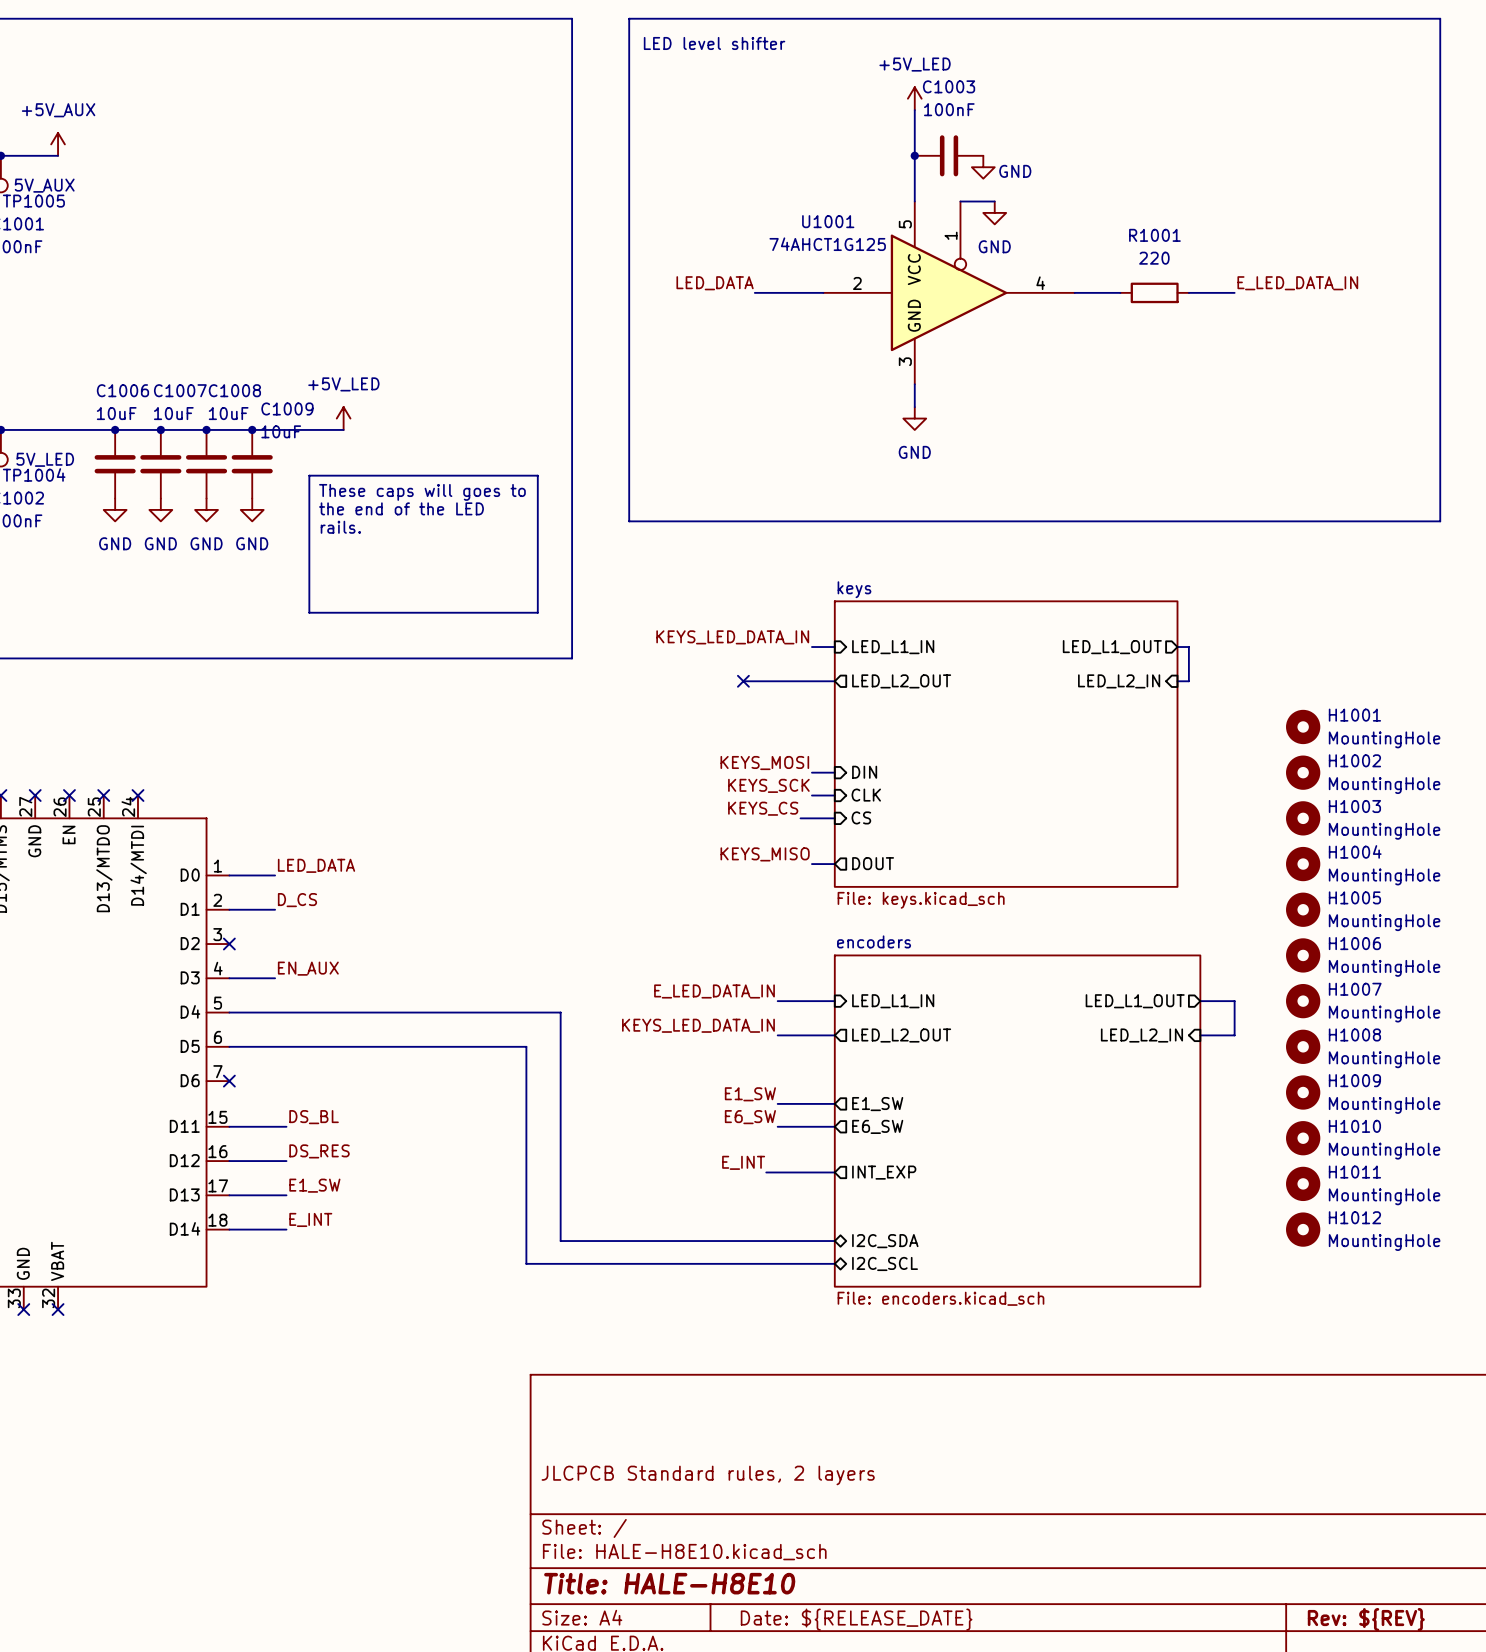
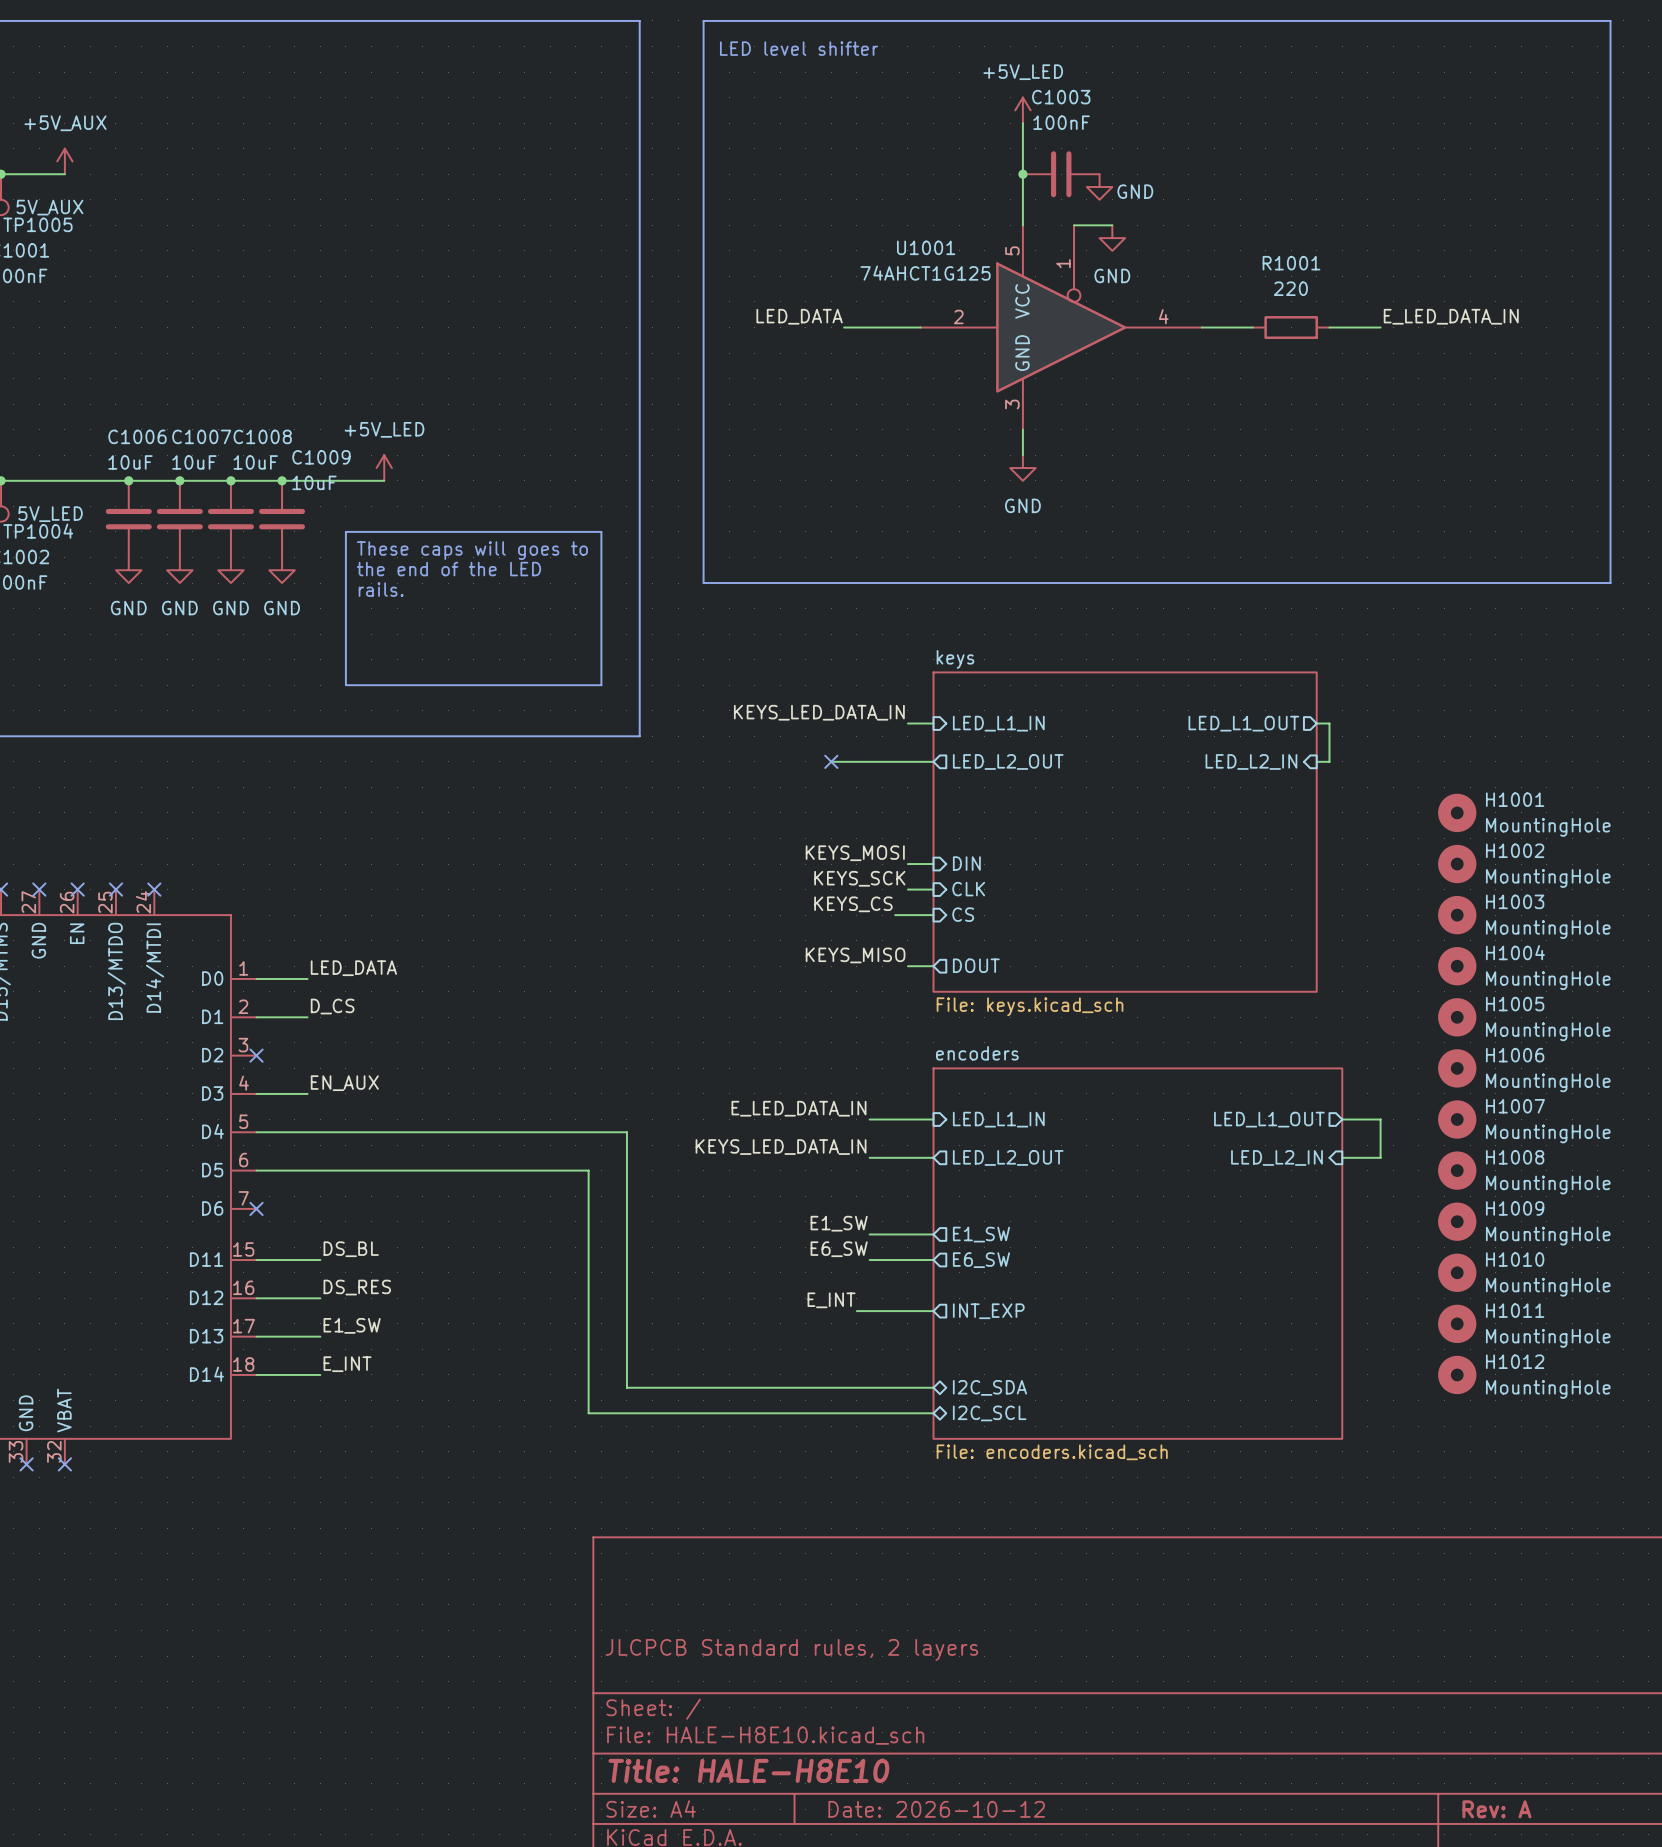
title block: Date: ${RELEASE_DATE} (856, 1619) -> Date: 2026-10-12 (936, 1809)
title block: Rev: ${REV} (1366, 1619) -> Rev: A (1496, 1809)

